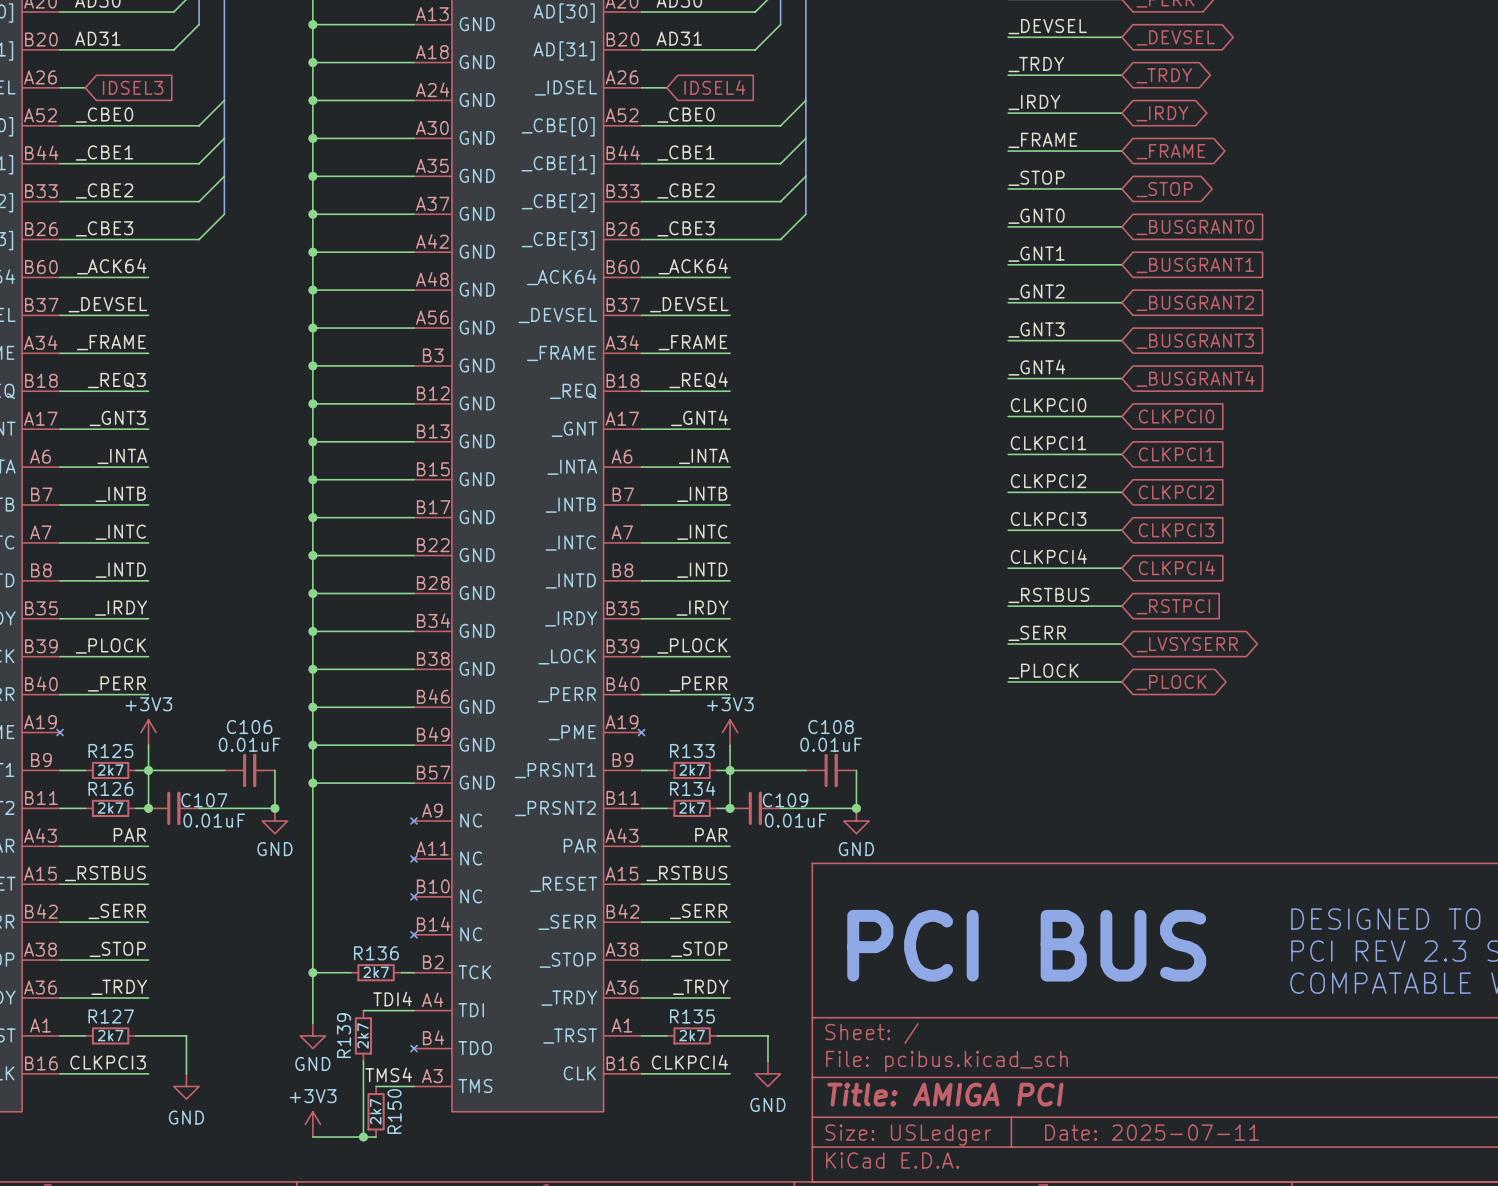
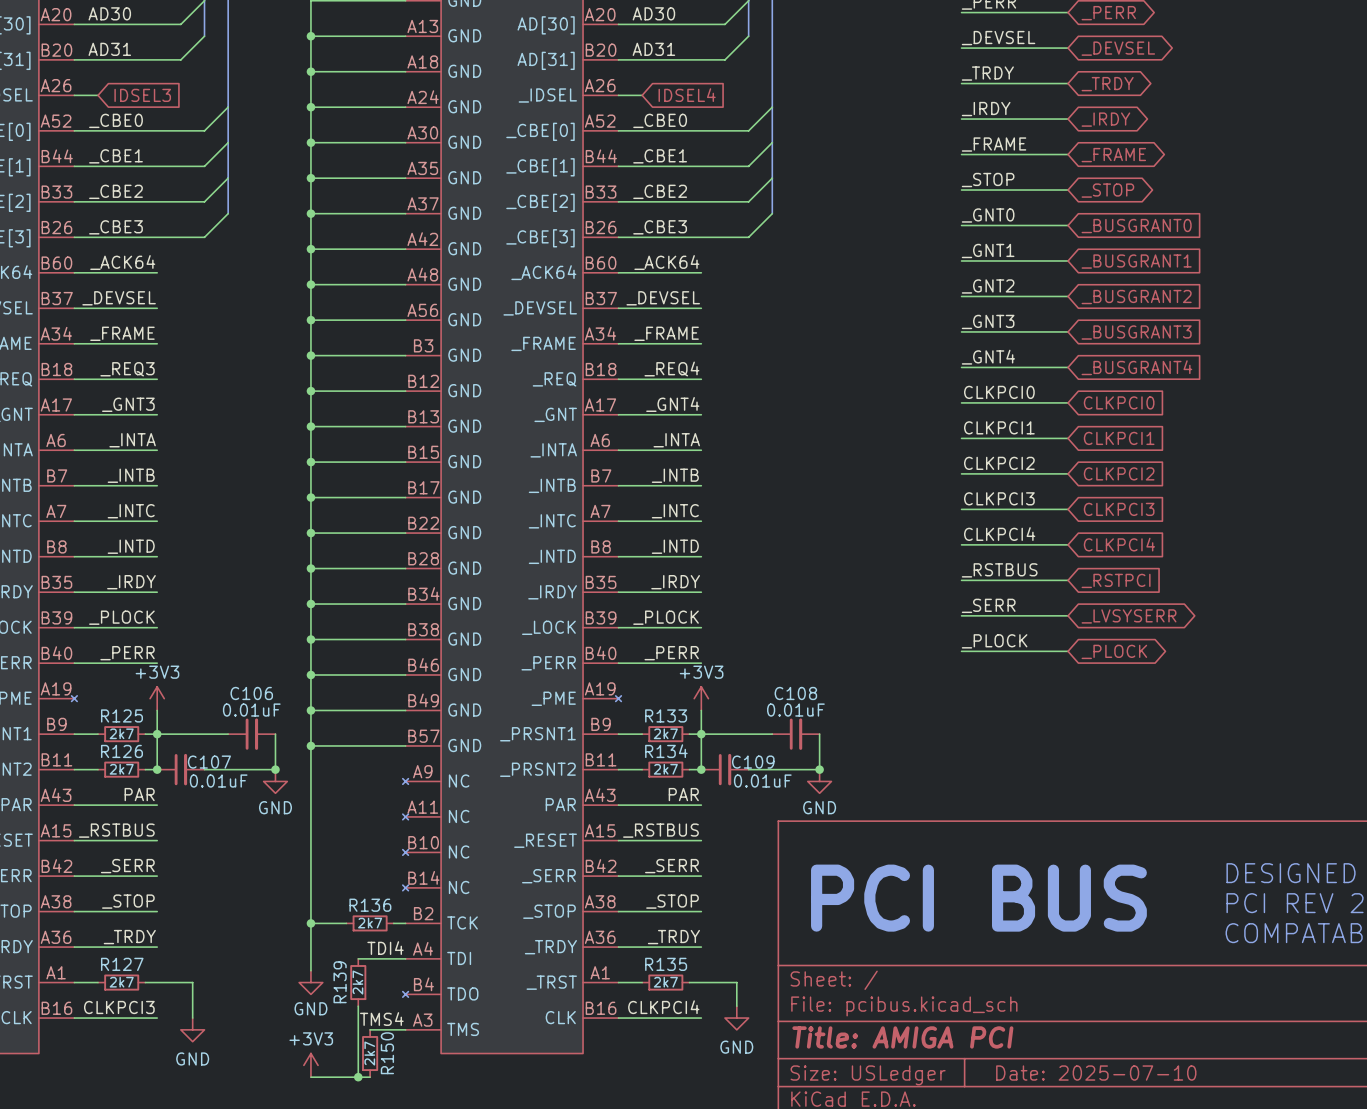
title block: Date: 2025-07-11 (1152, 1132) -> Date: 2025-07-10 (1096, 1073)

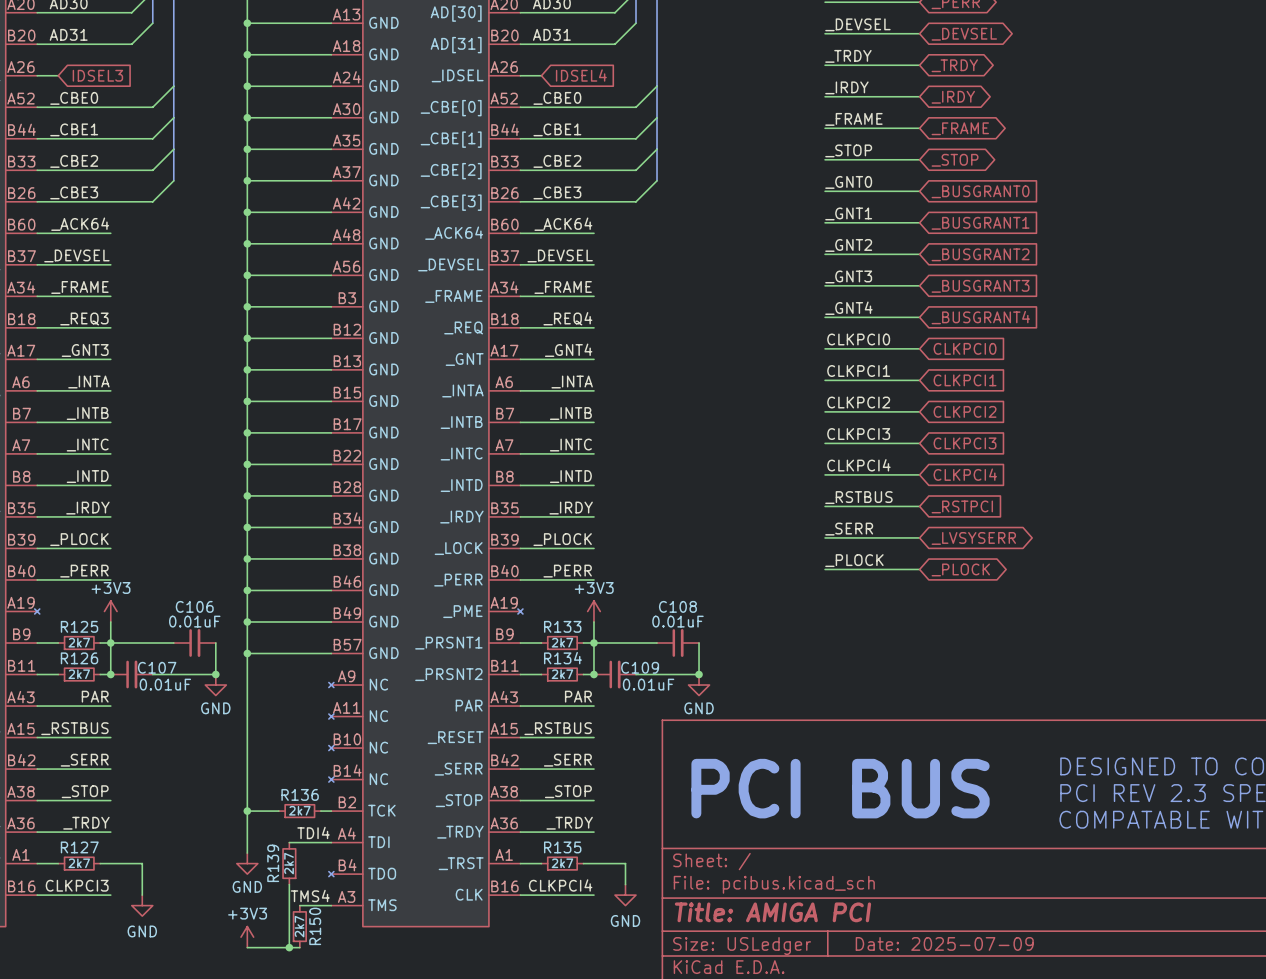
title block: Date: 2025-07-10 (1096, 1073) -> Date: 2025-07-09 (944, 943)

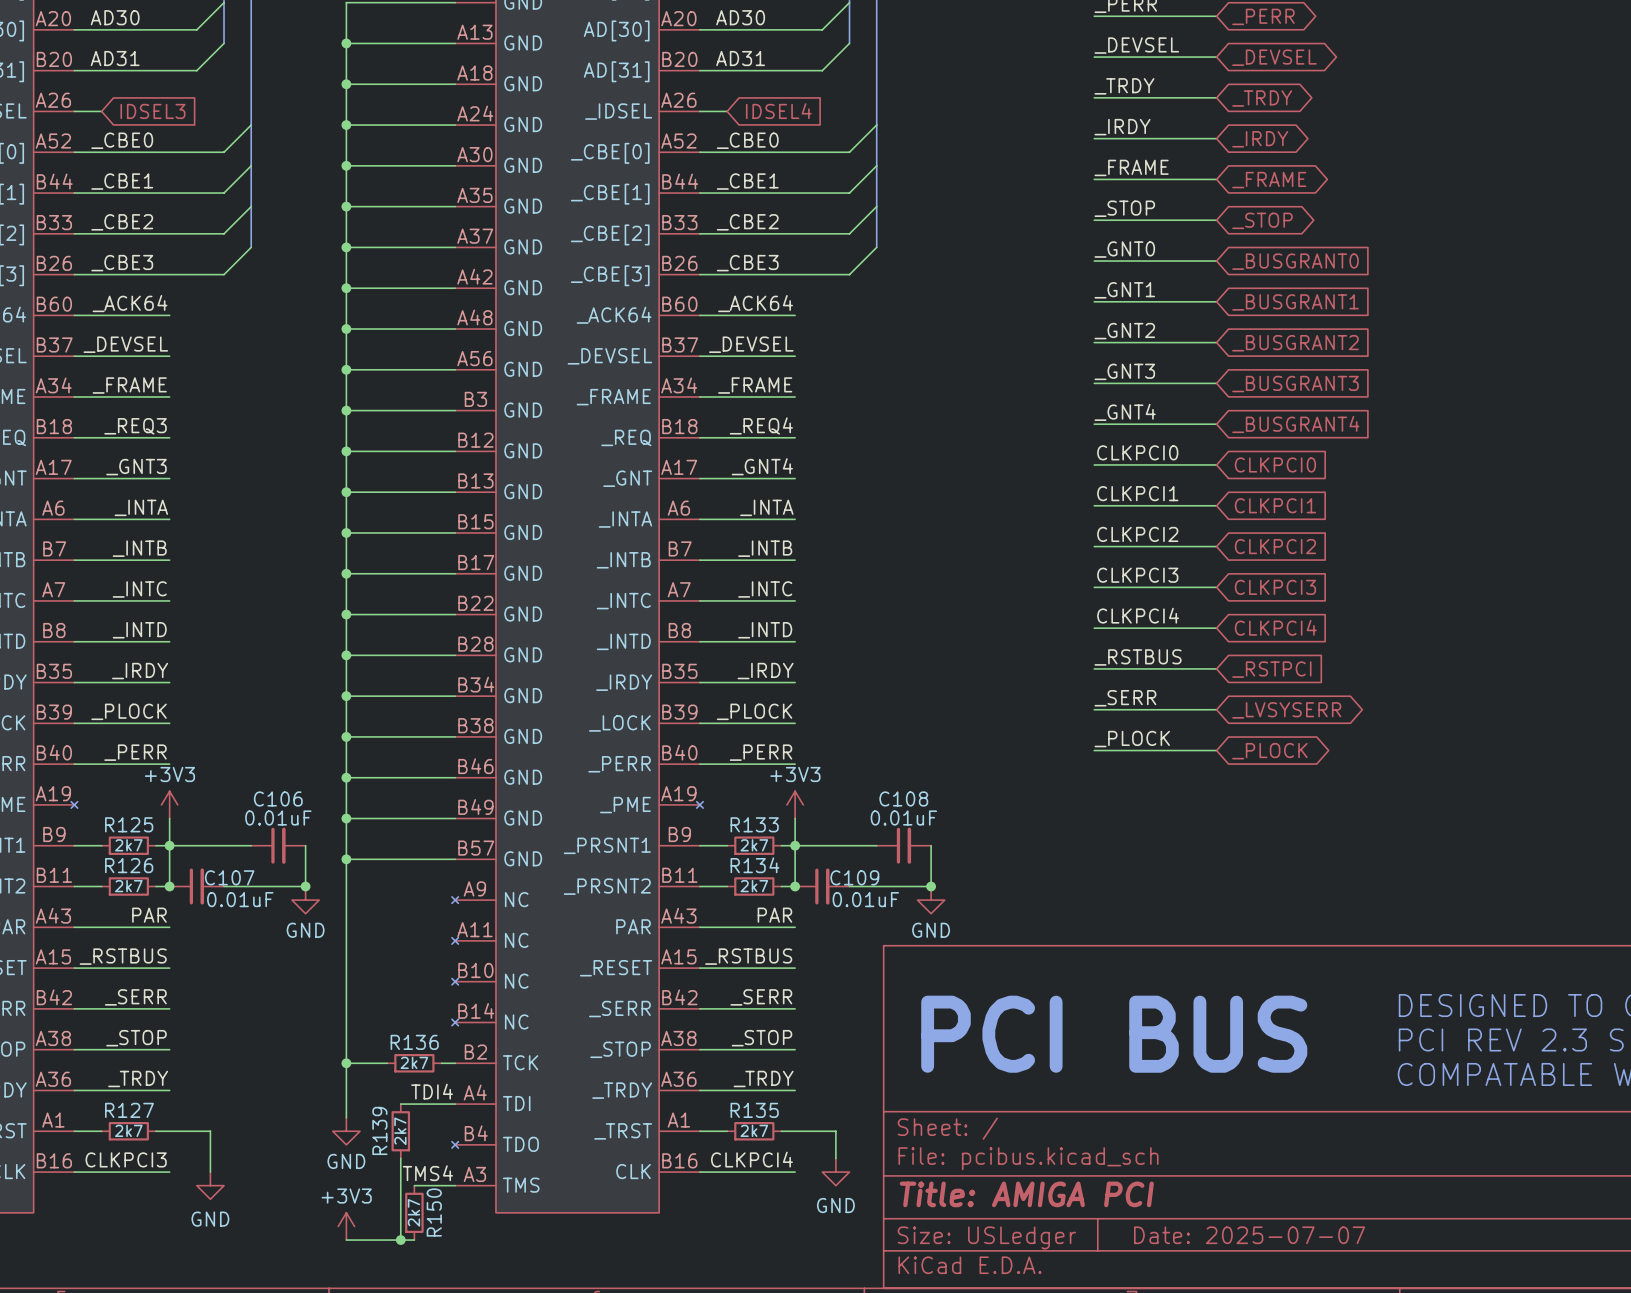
title block: Date: 2025-07-09 (944, 943) -> Date: 2025-07-07 (1249, 1235)

